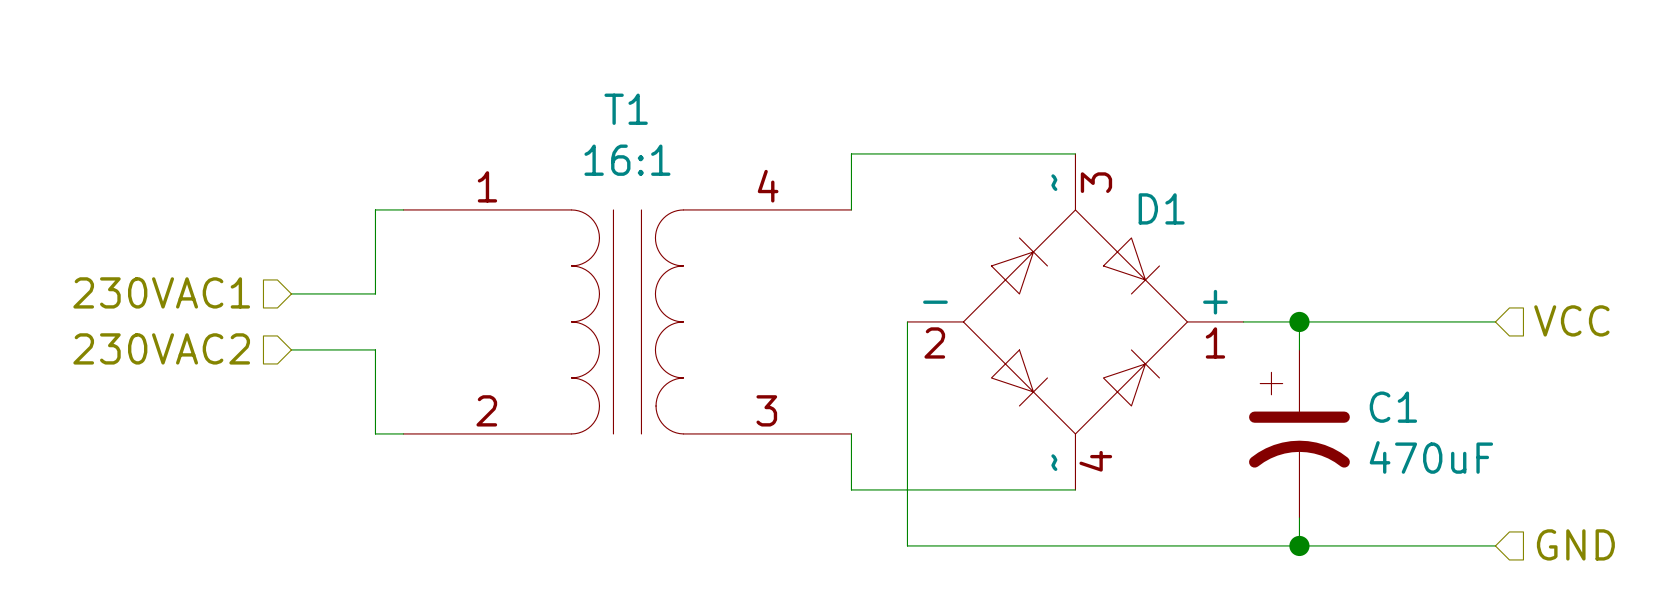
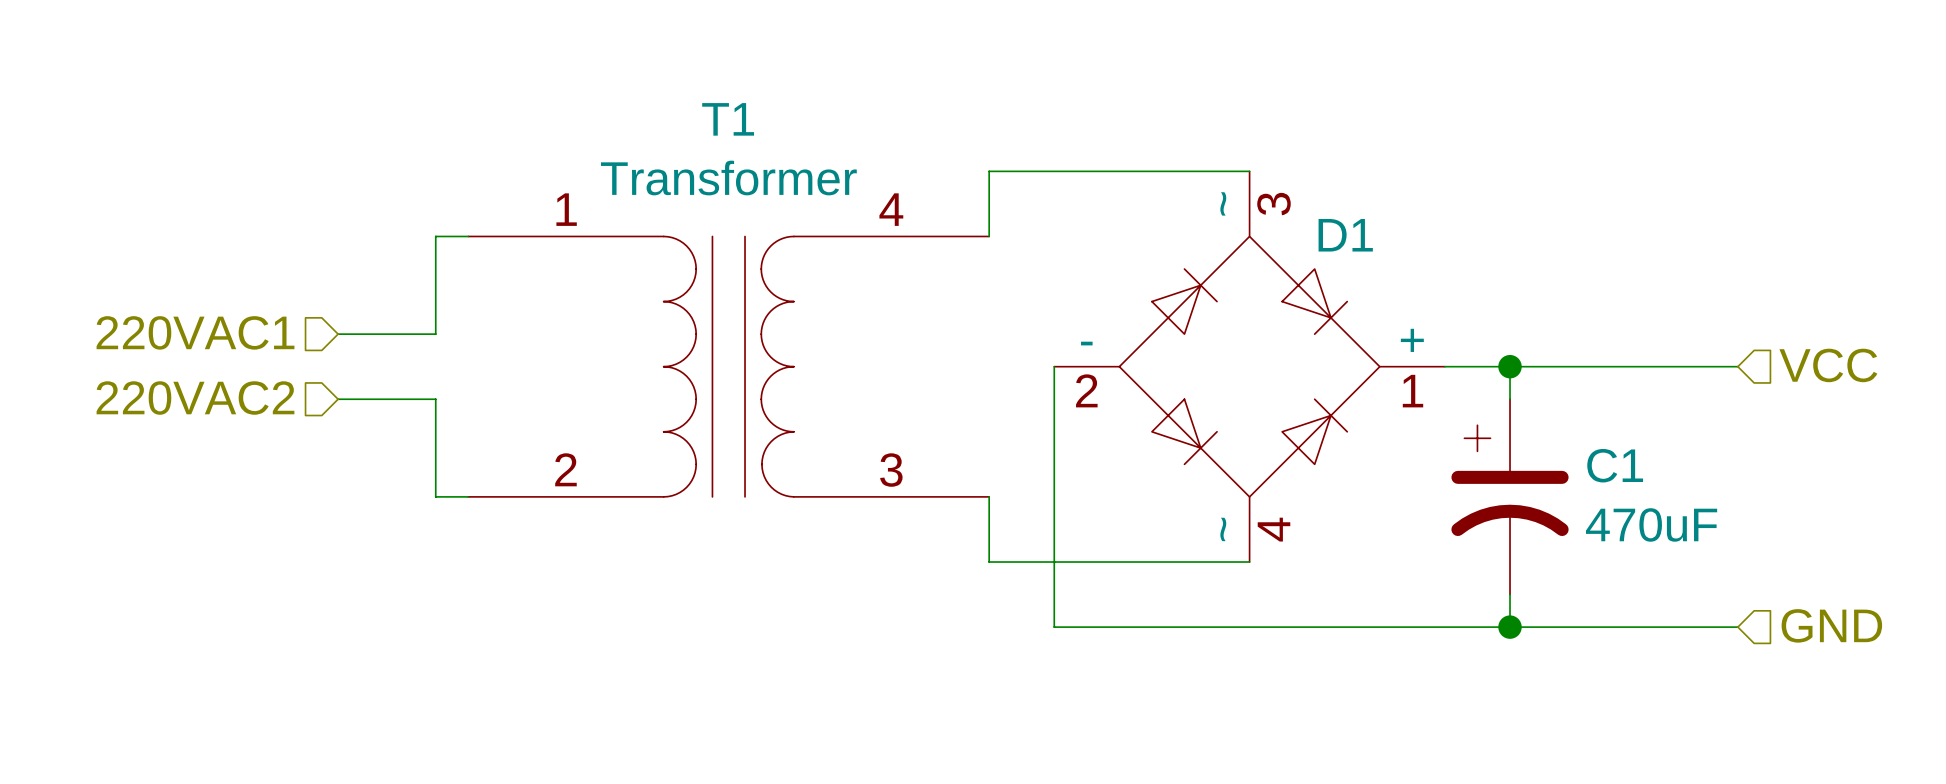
T1 value: 16:1 (627, 160) -> Transformer (728, 178)
hierarchical label: 230VAC1 (161, 292) -> 220VAC1 (195, 332)
hierarchical label: 230VAC2 (161, 348) -> 220VAC2 (195, 398)

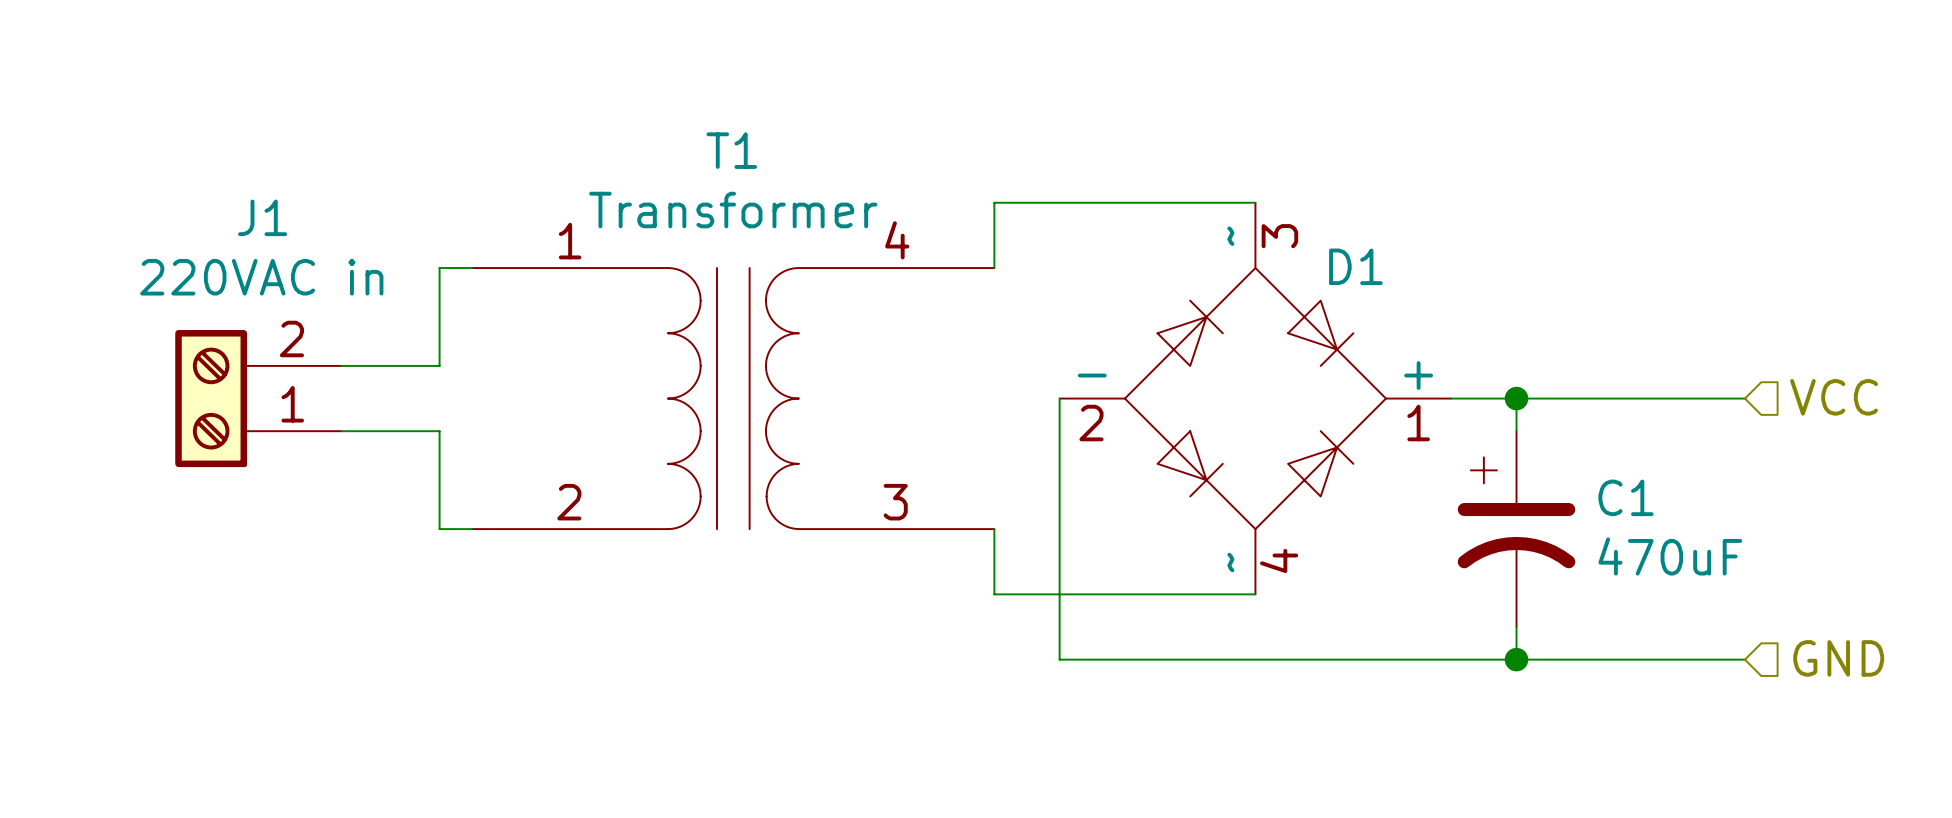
hierarchical label: 220VAC1 (195, 332) -> none
J1: none -> 220VAC in (258, 398)
hierarchical label: 220VAC2 (195, 398) -> none

